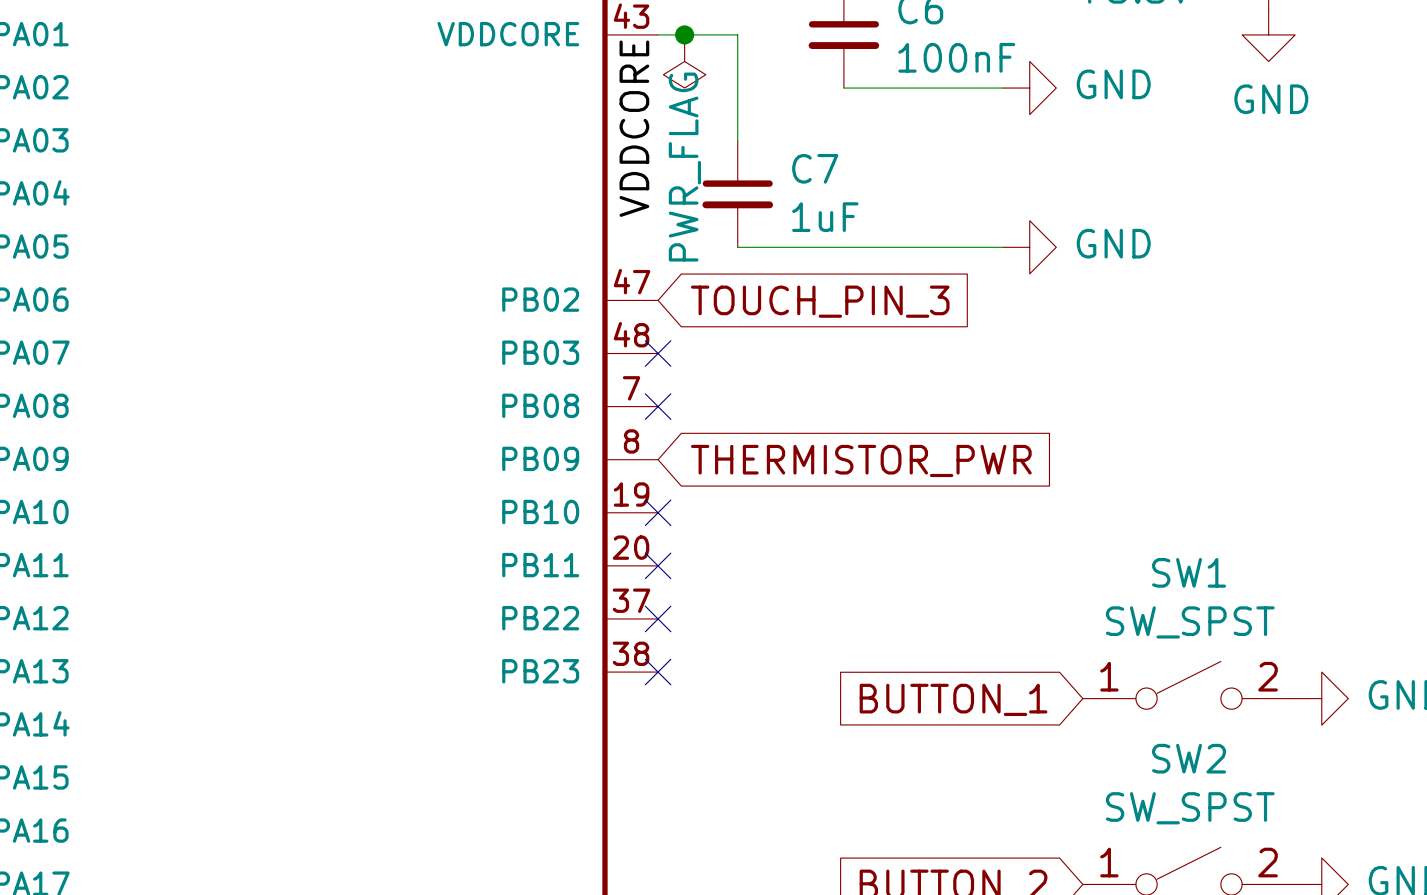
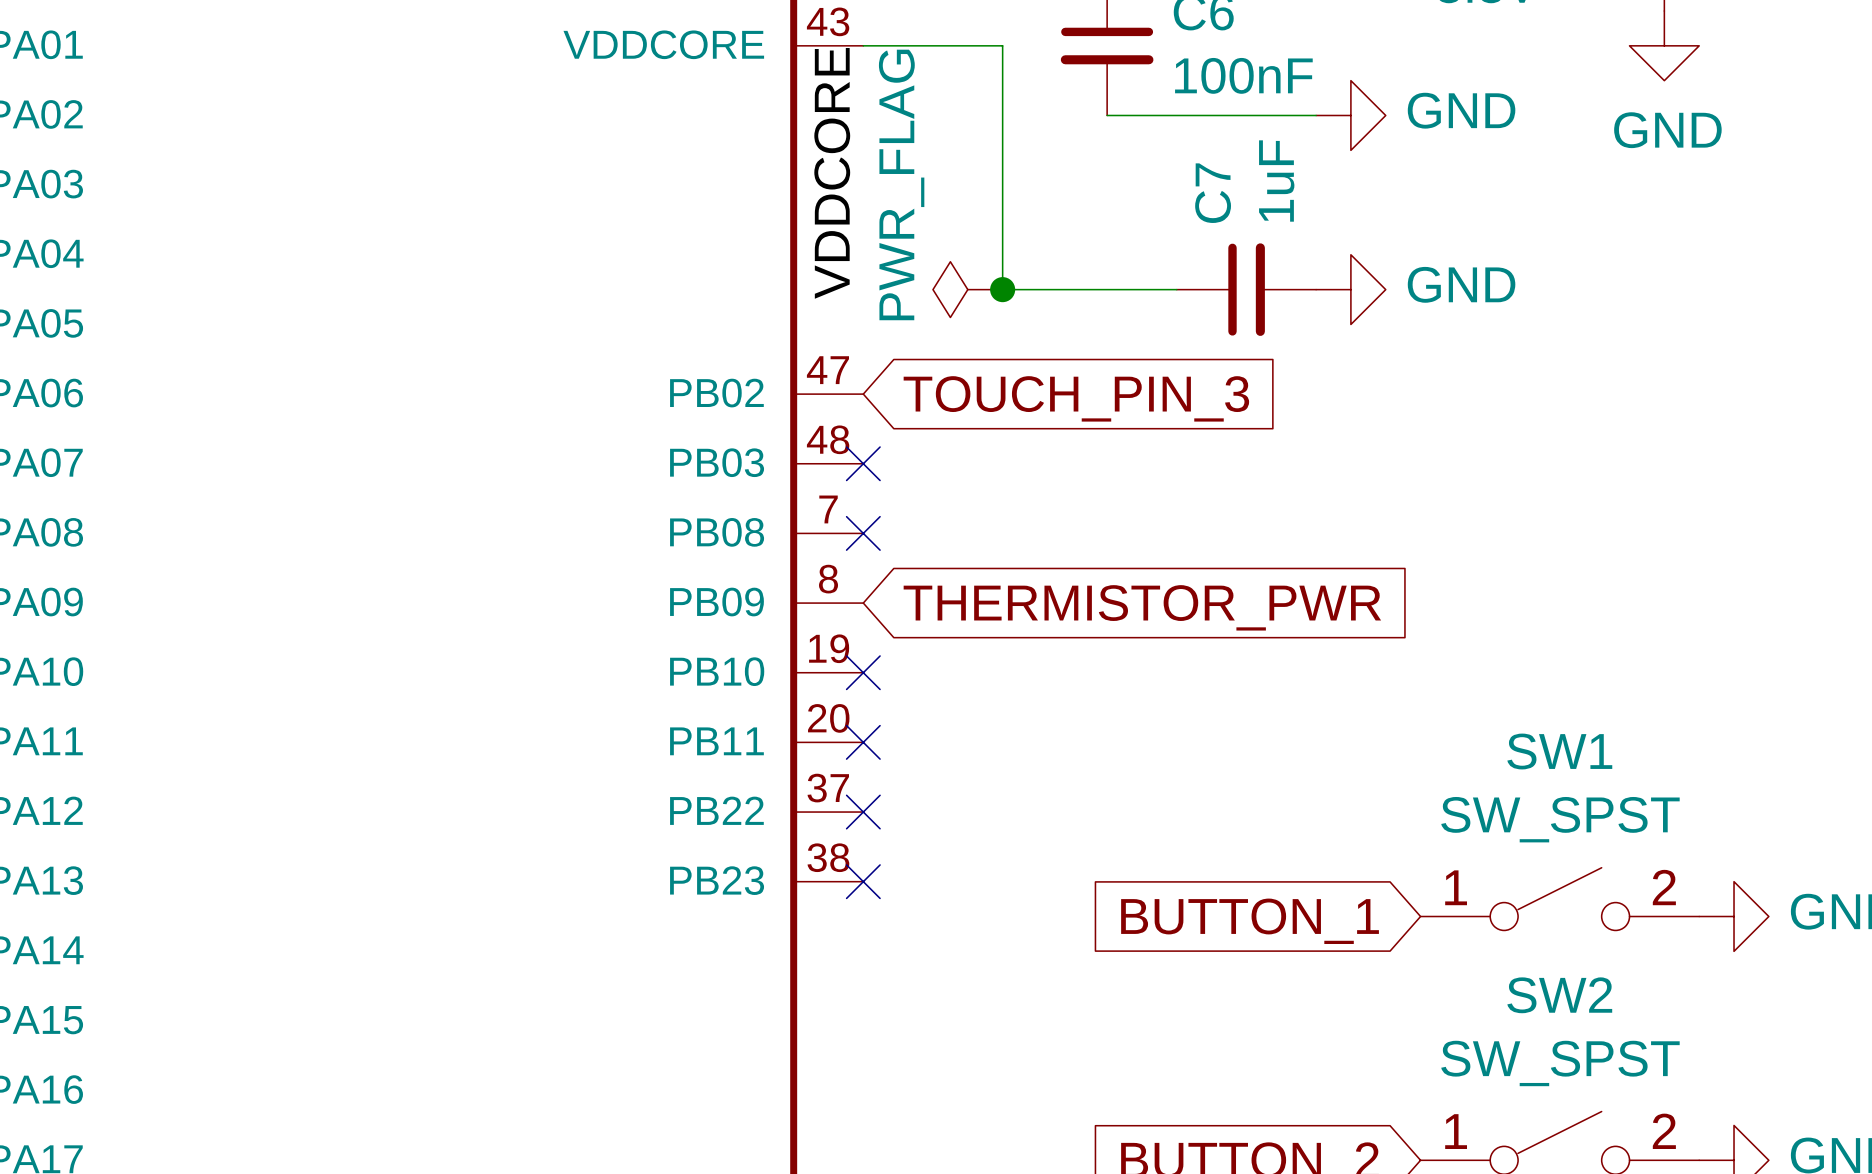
junction: (684, 34) -> none
wire: (737, 34) (737, 141) -> (967, 45) (1002, 45) (1002, 289) (1176, 289)
power symbol rotation: 0° (684, 61) -> 90° clockwise (967, 289)
power symbol position: PWR_FLAG (684, 61) -> PWR_FLAG (967, 289)
power symbol text position: PWR_FLAG (684, 167) -> PWR_FLAG (901, 184)
C7 rotation: 0° (737, 194) -> 90° counterclockwise (1246, 289)
C7 position: (737, 194) -> (1246, 289)
junction: none -> (1002, 289)
wire: (737, 247) (1003, 247) -> none
power symbol position: GND (1029, 247) -> GND (1350, 289)

